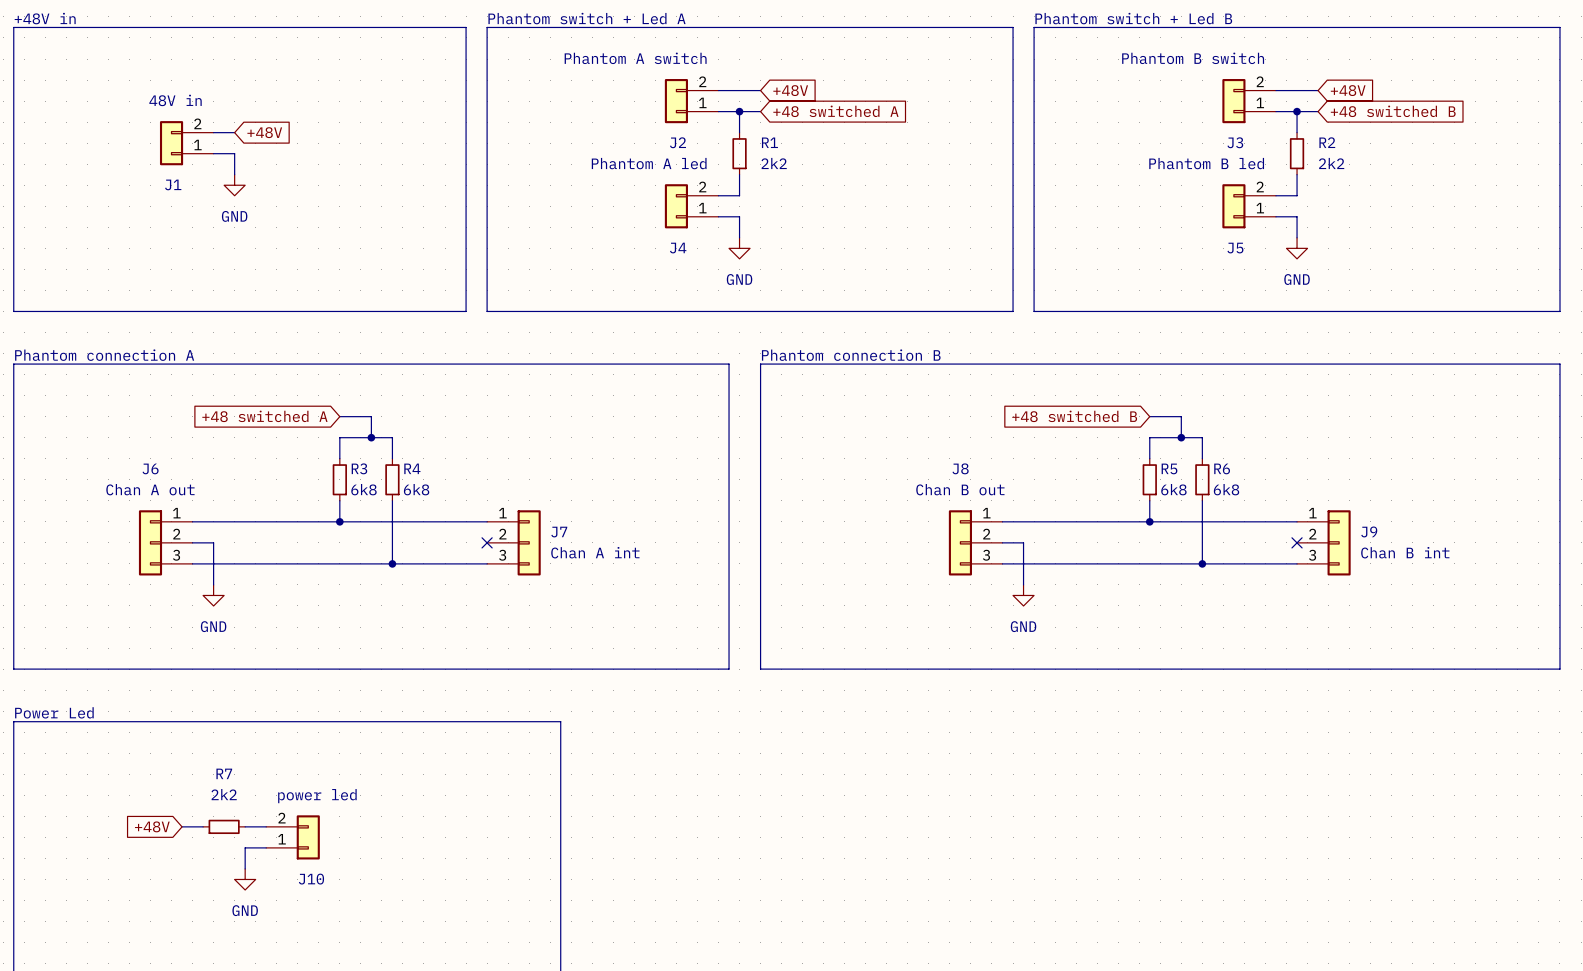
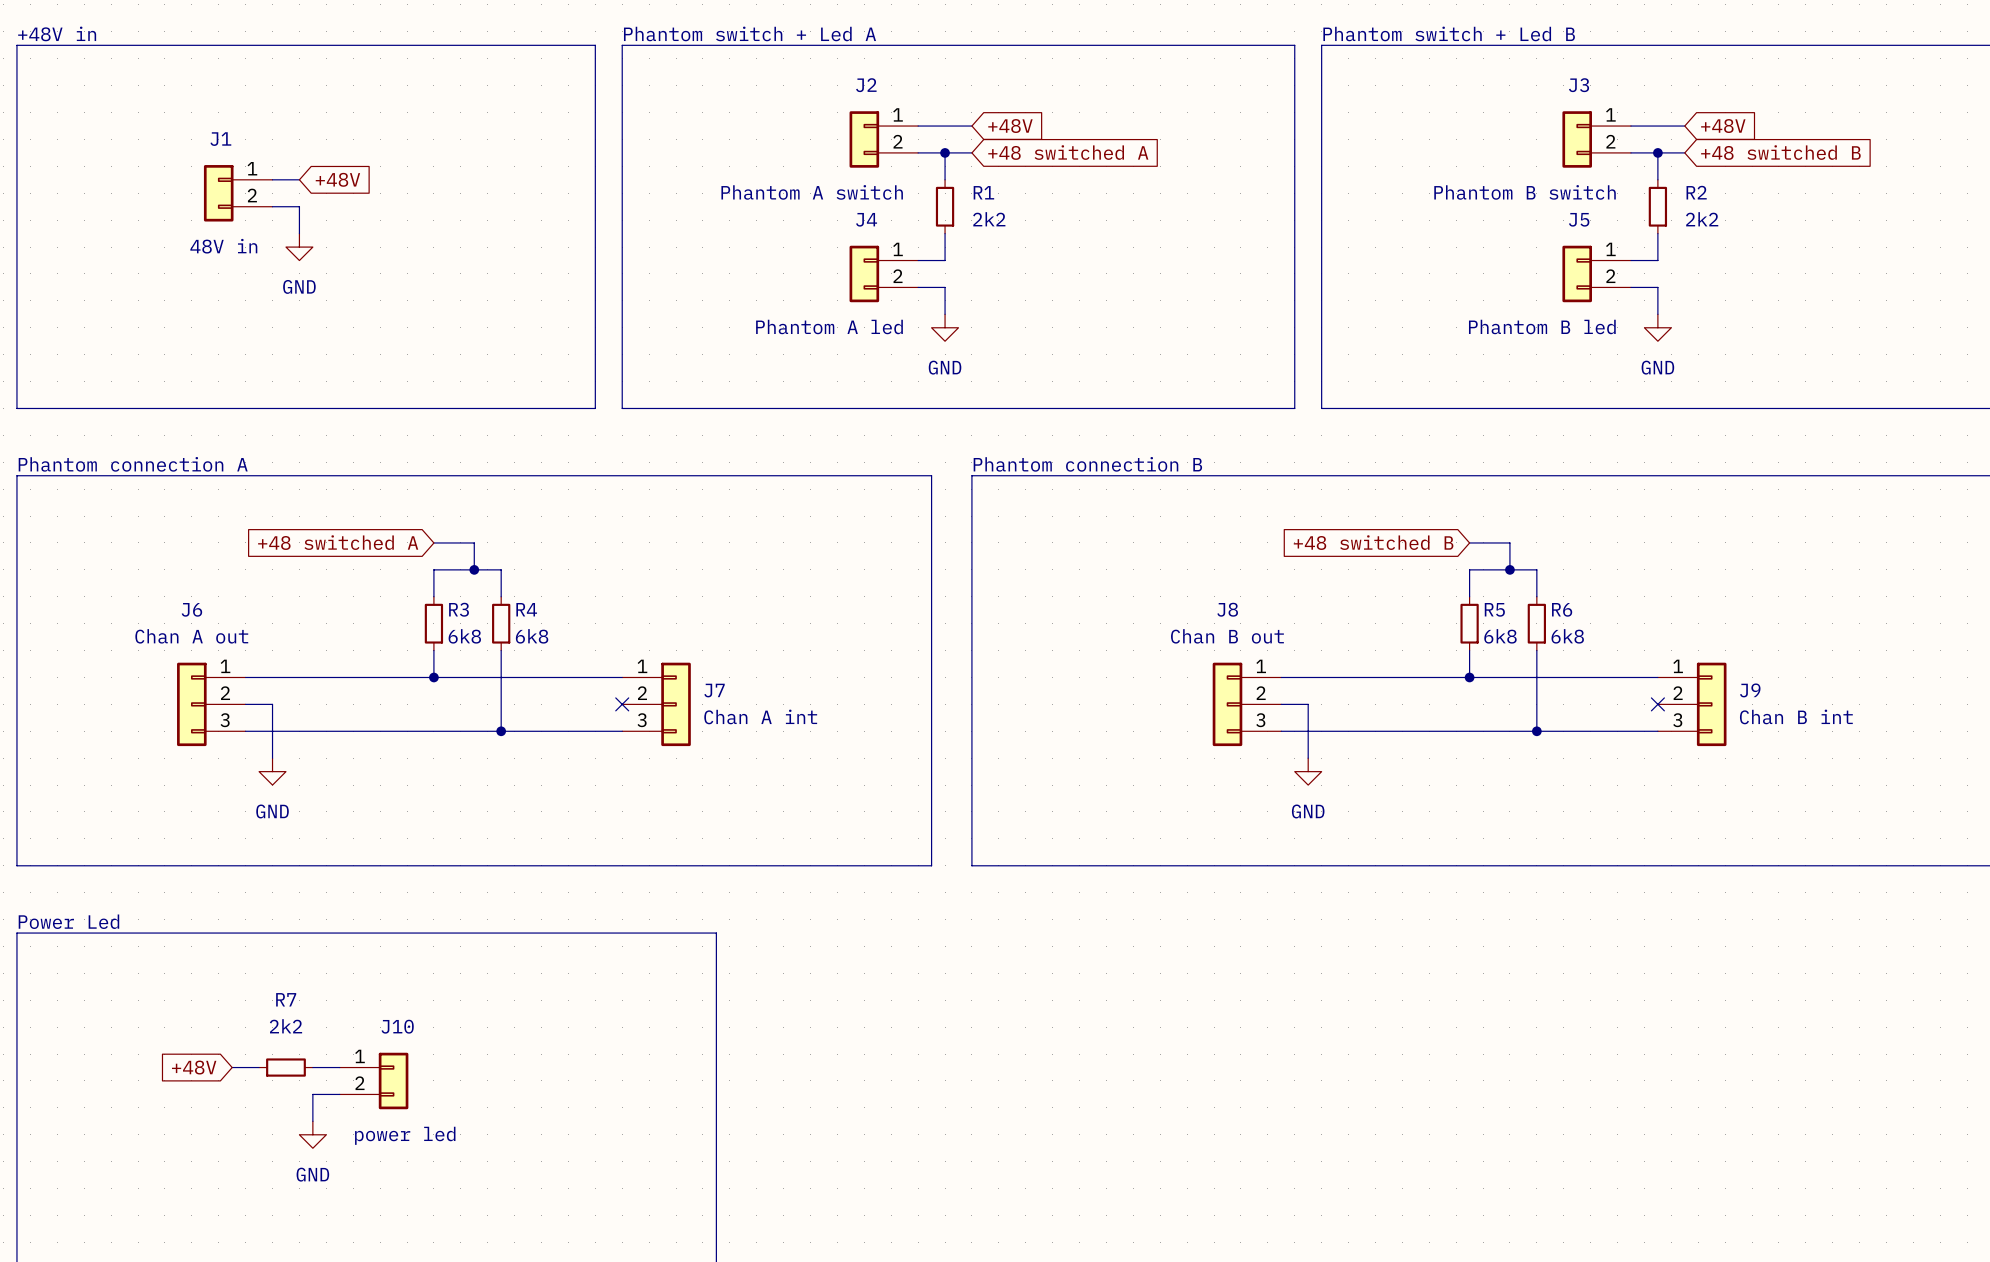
J2 flip: as is (676, 101) -> up-down (864, 139)
J3 flip: as is (1233, 101) -> up-down (1577, 139)
J1 flip: as is (171, 143) -> up-down (218, 193)
J4 flip: as is (676, 206) -> up-down (864, 273)
J5 flip: as is (1233, 206) -> up-down (1577, 273)
J10 flip: as is (308, 837) -> up-down (393, 1080)

